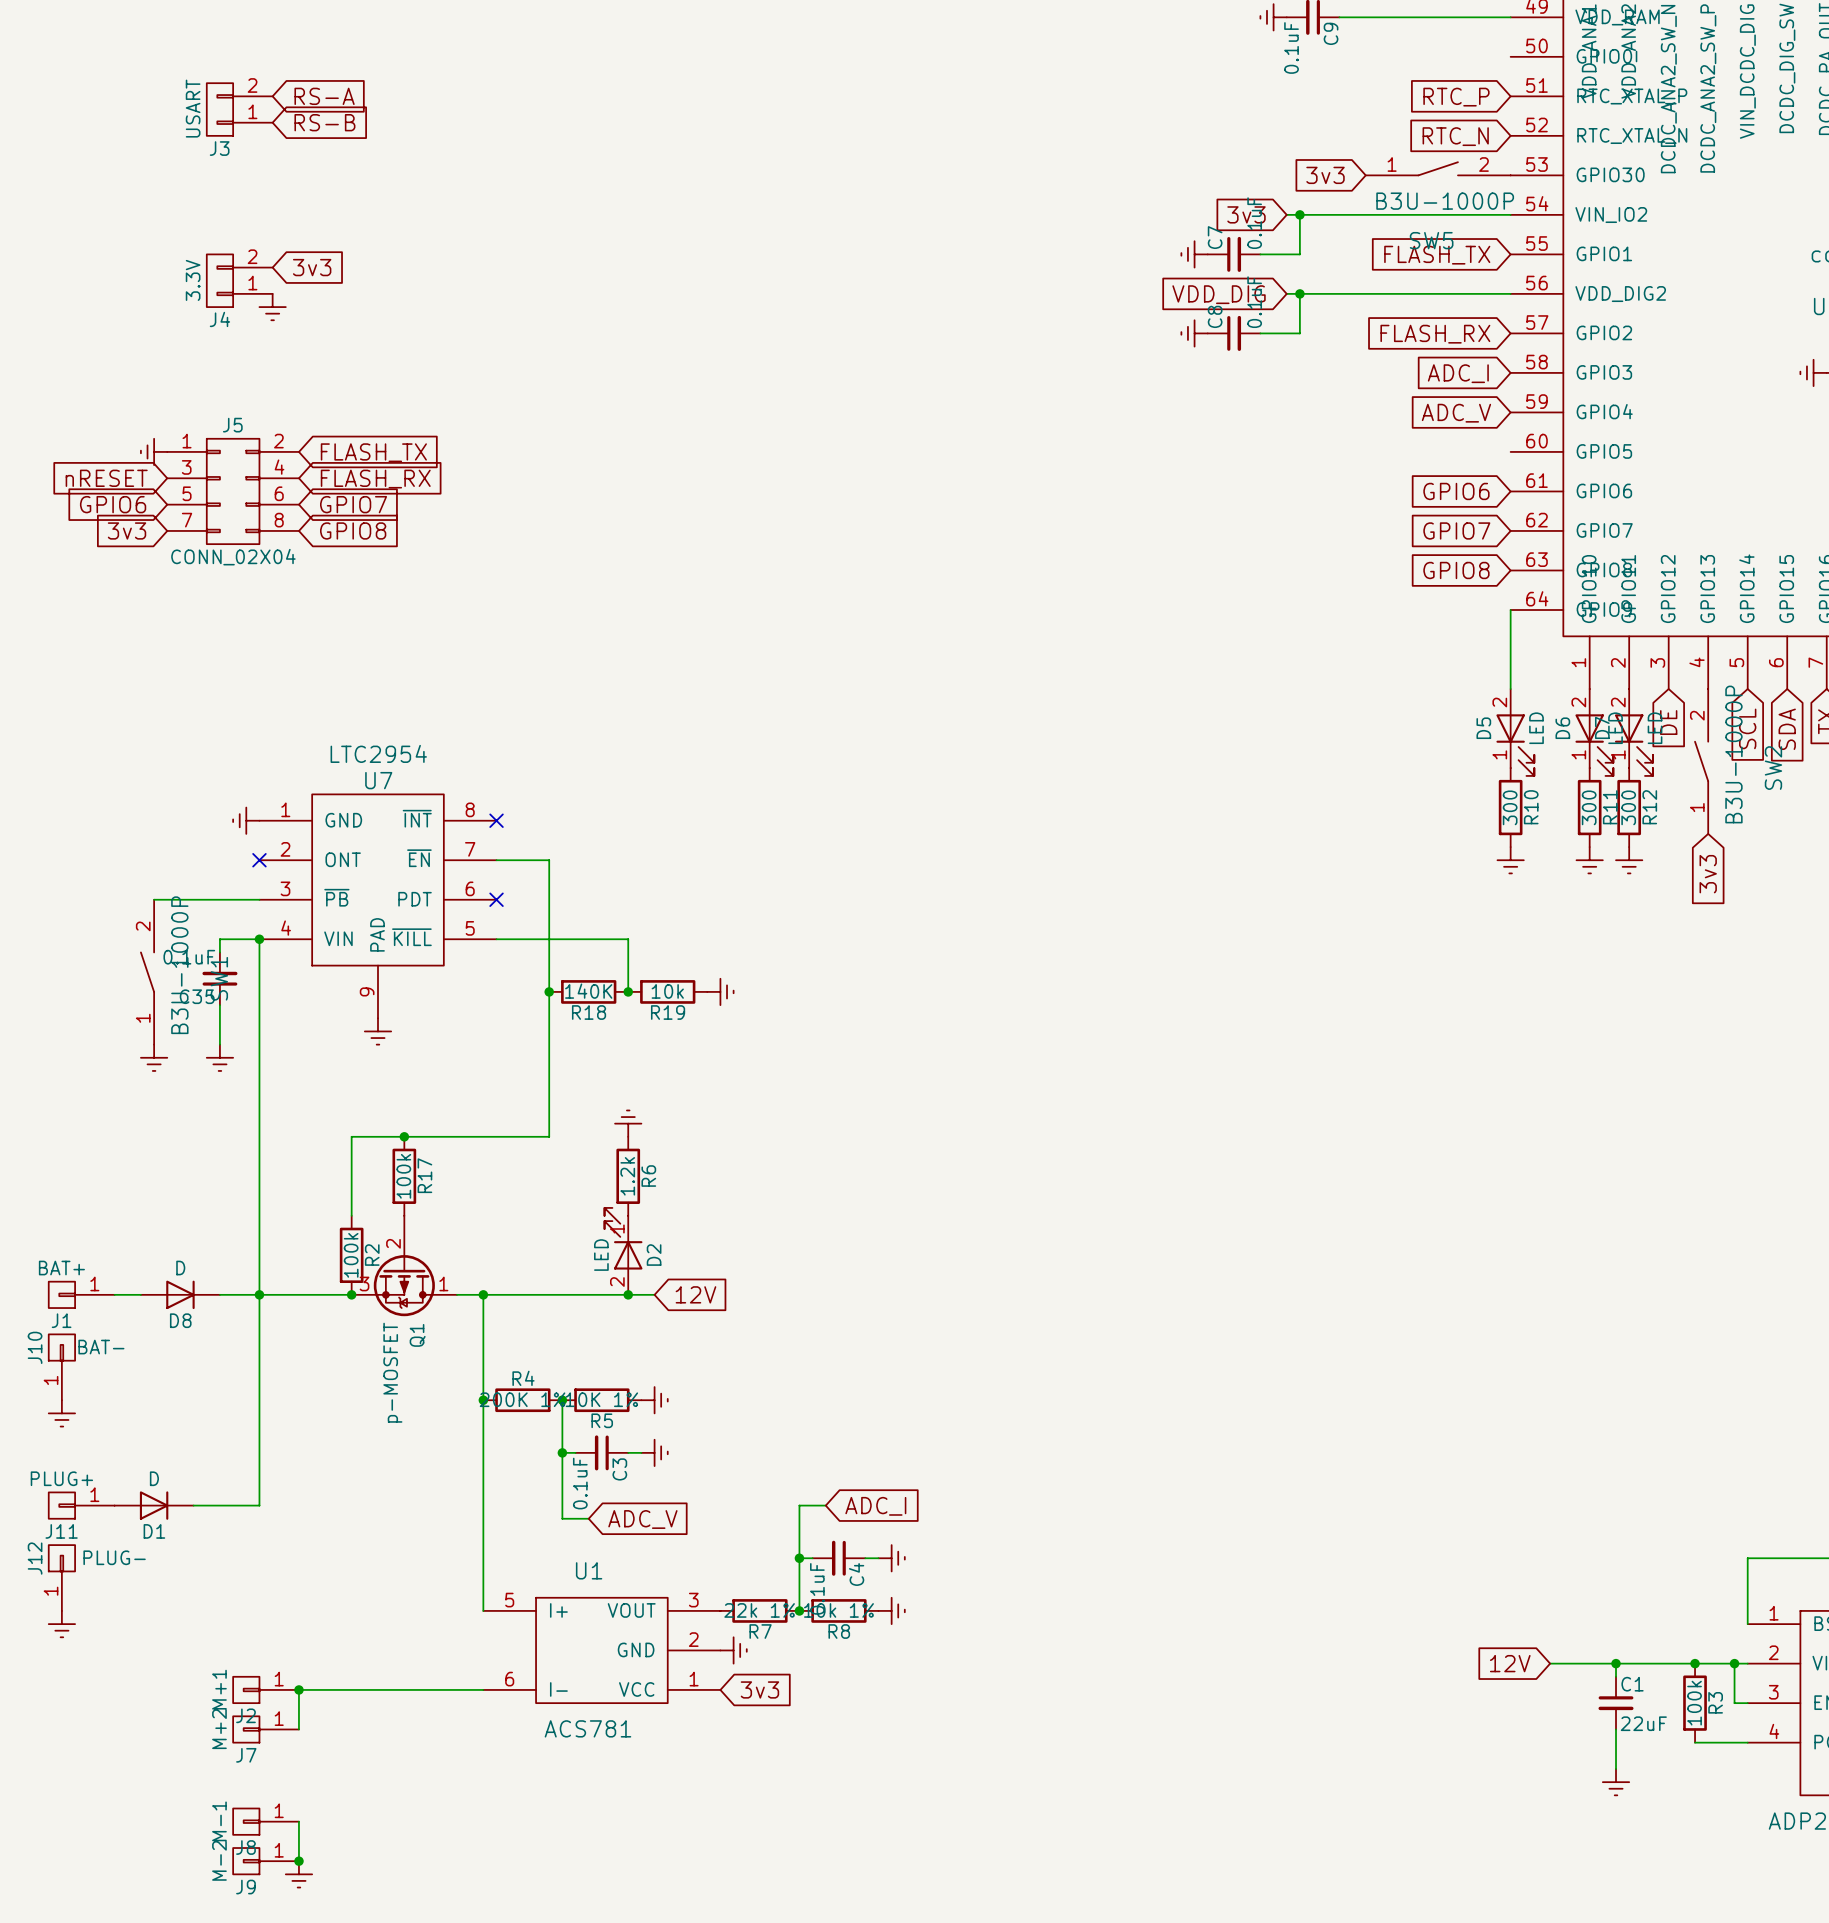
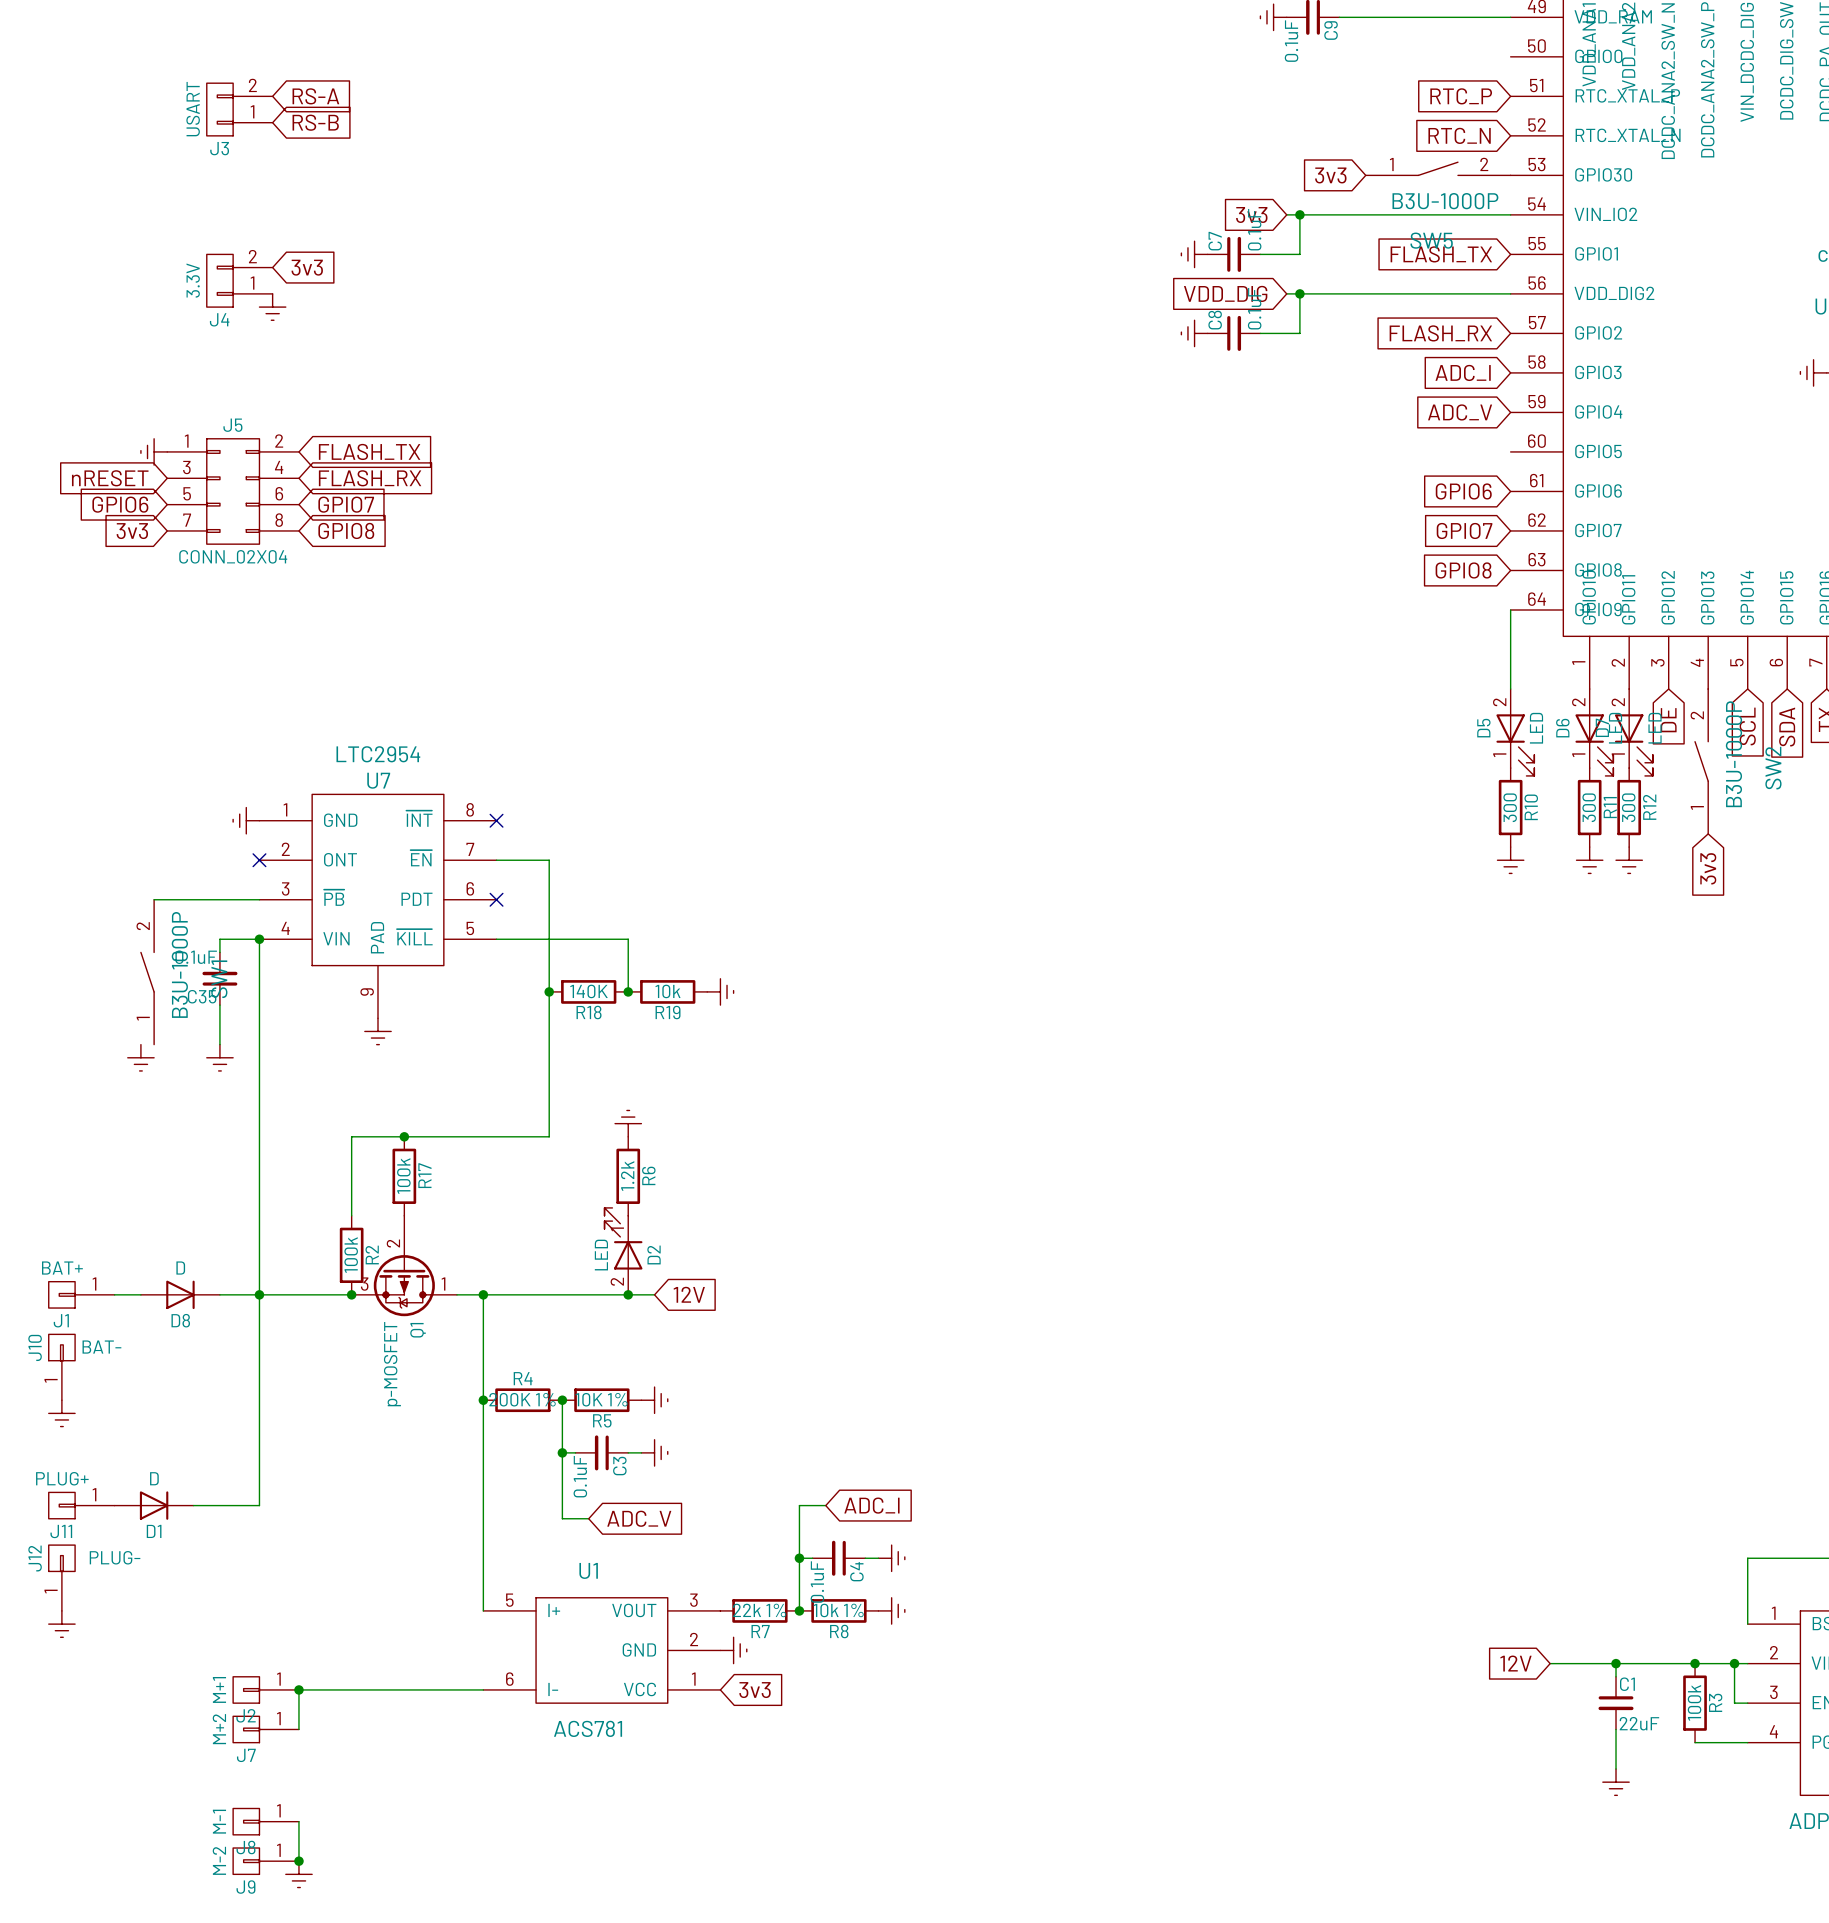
power symbol position: (154, 1057) -> (140, 1057)

